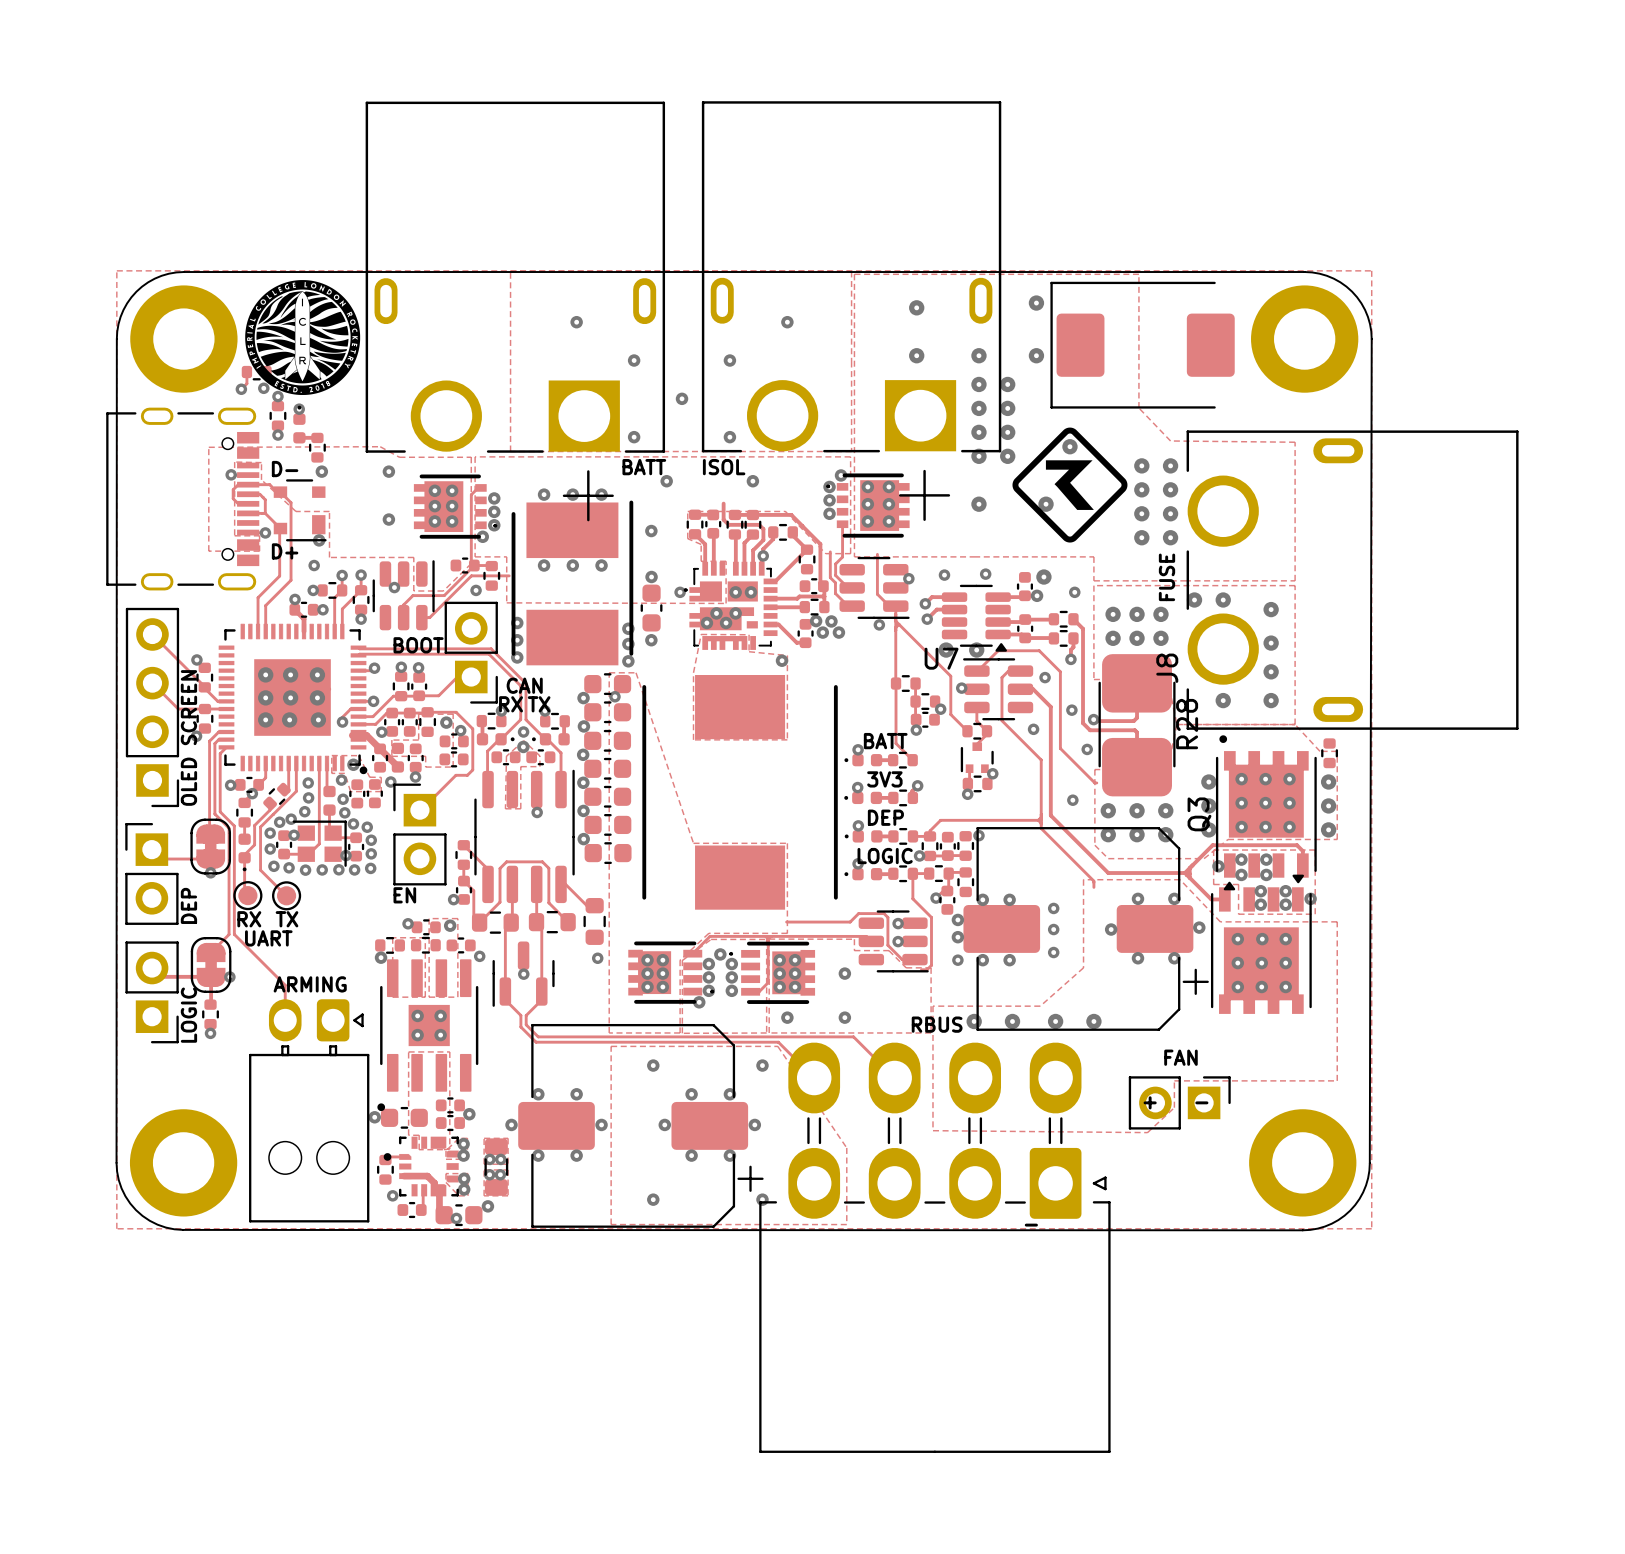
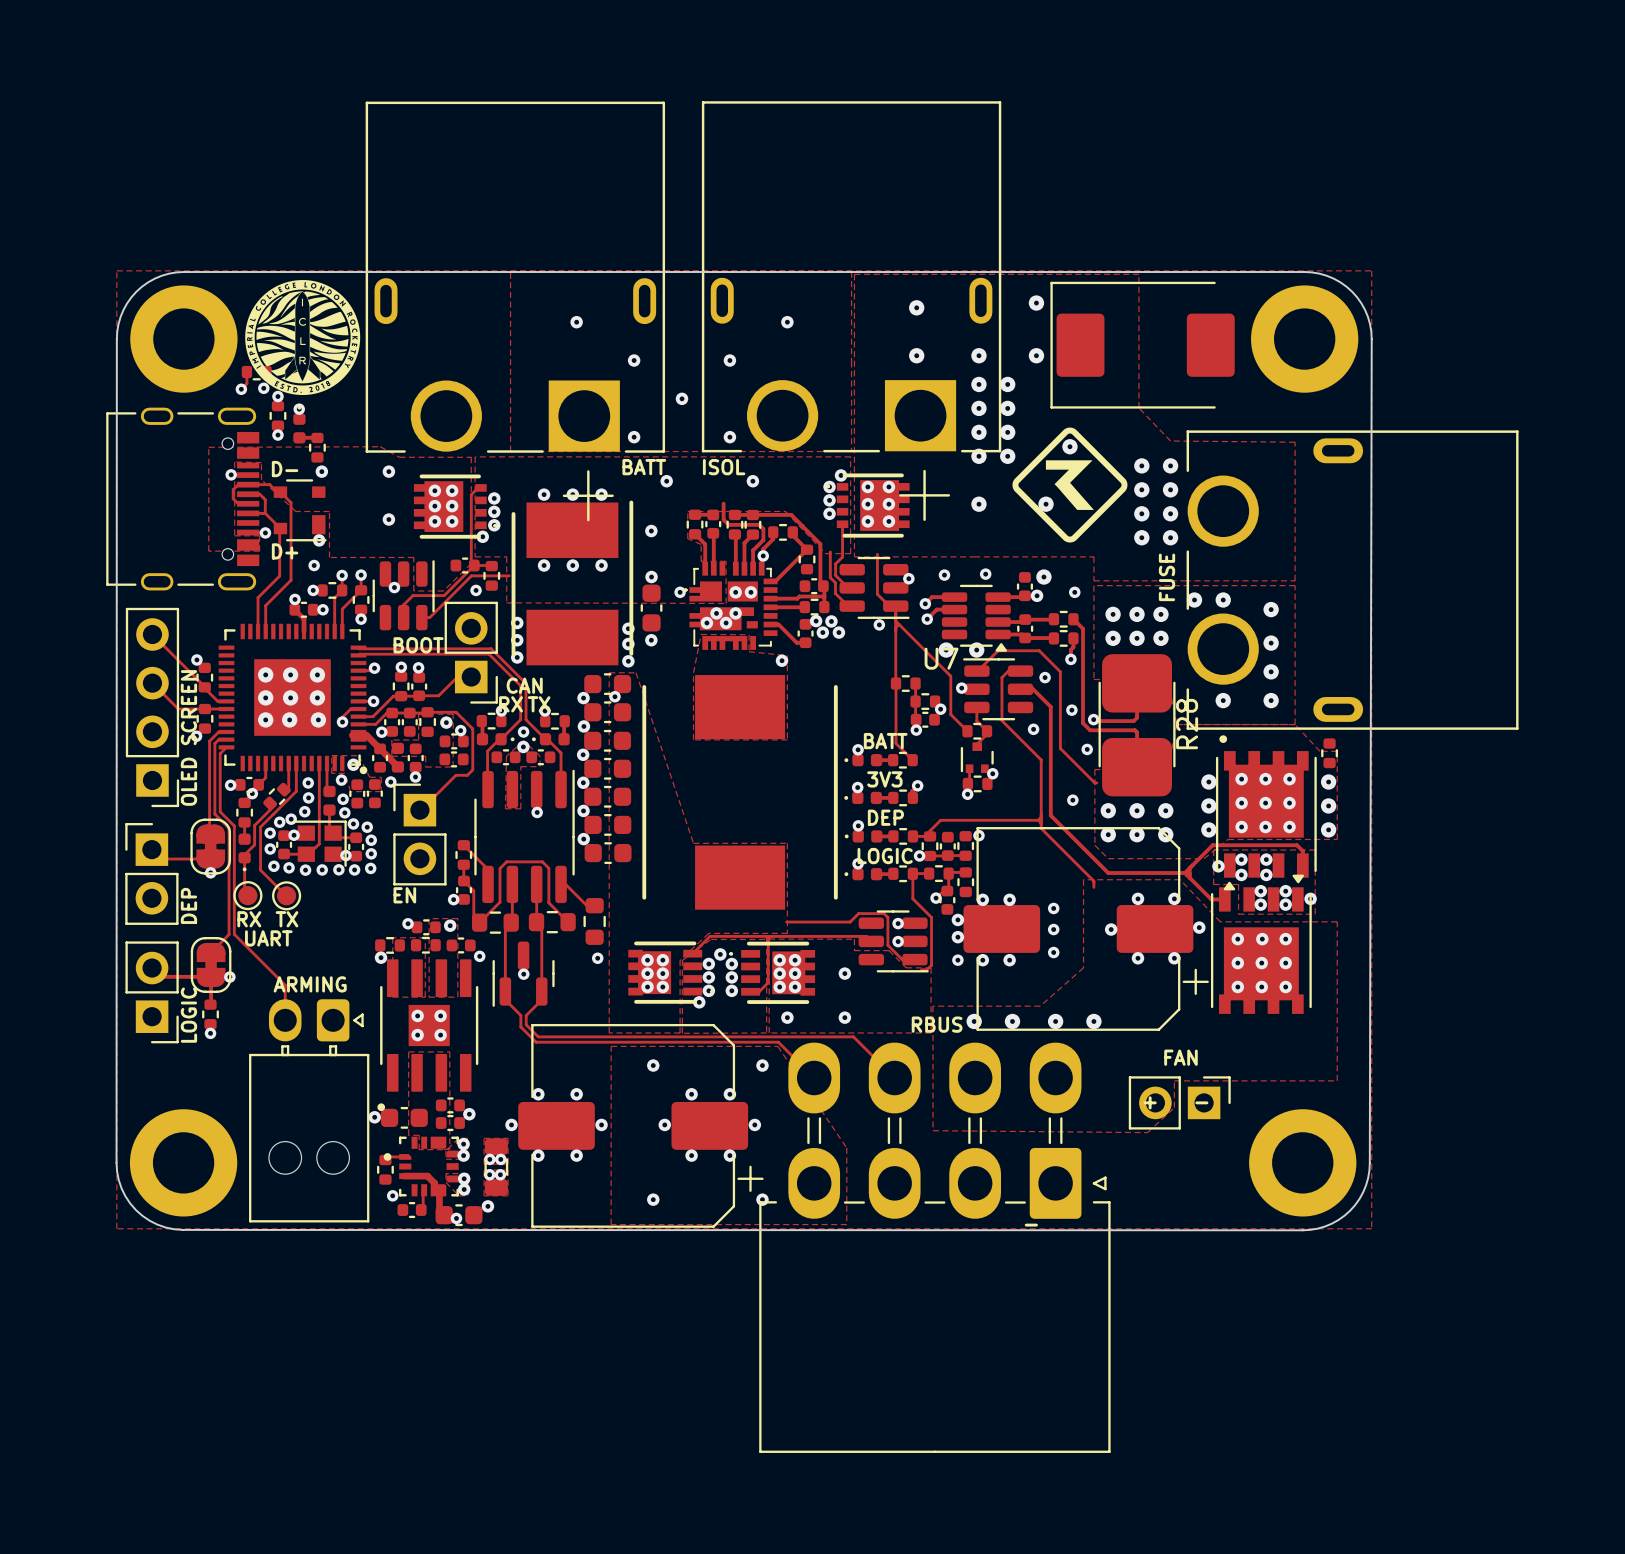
J8 name: J8 (1167, 668) -> none
Q3 name: Q3 (1199, 814) -> none

